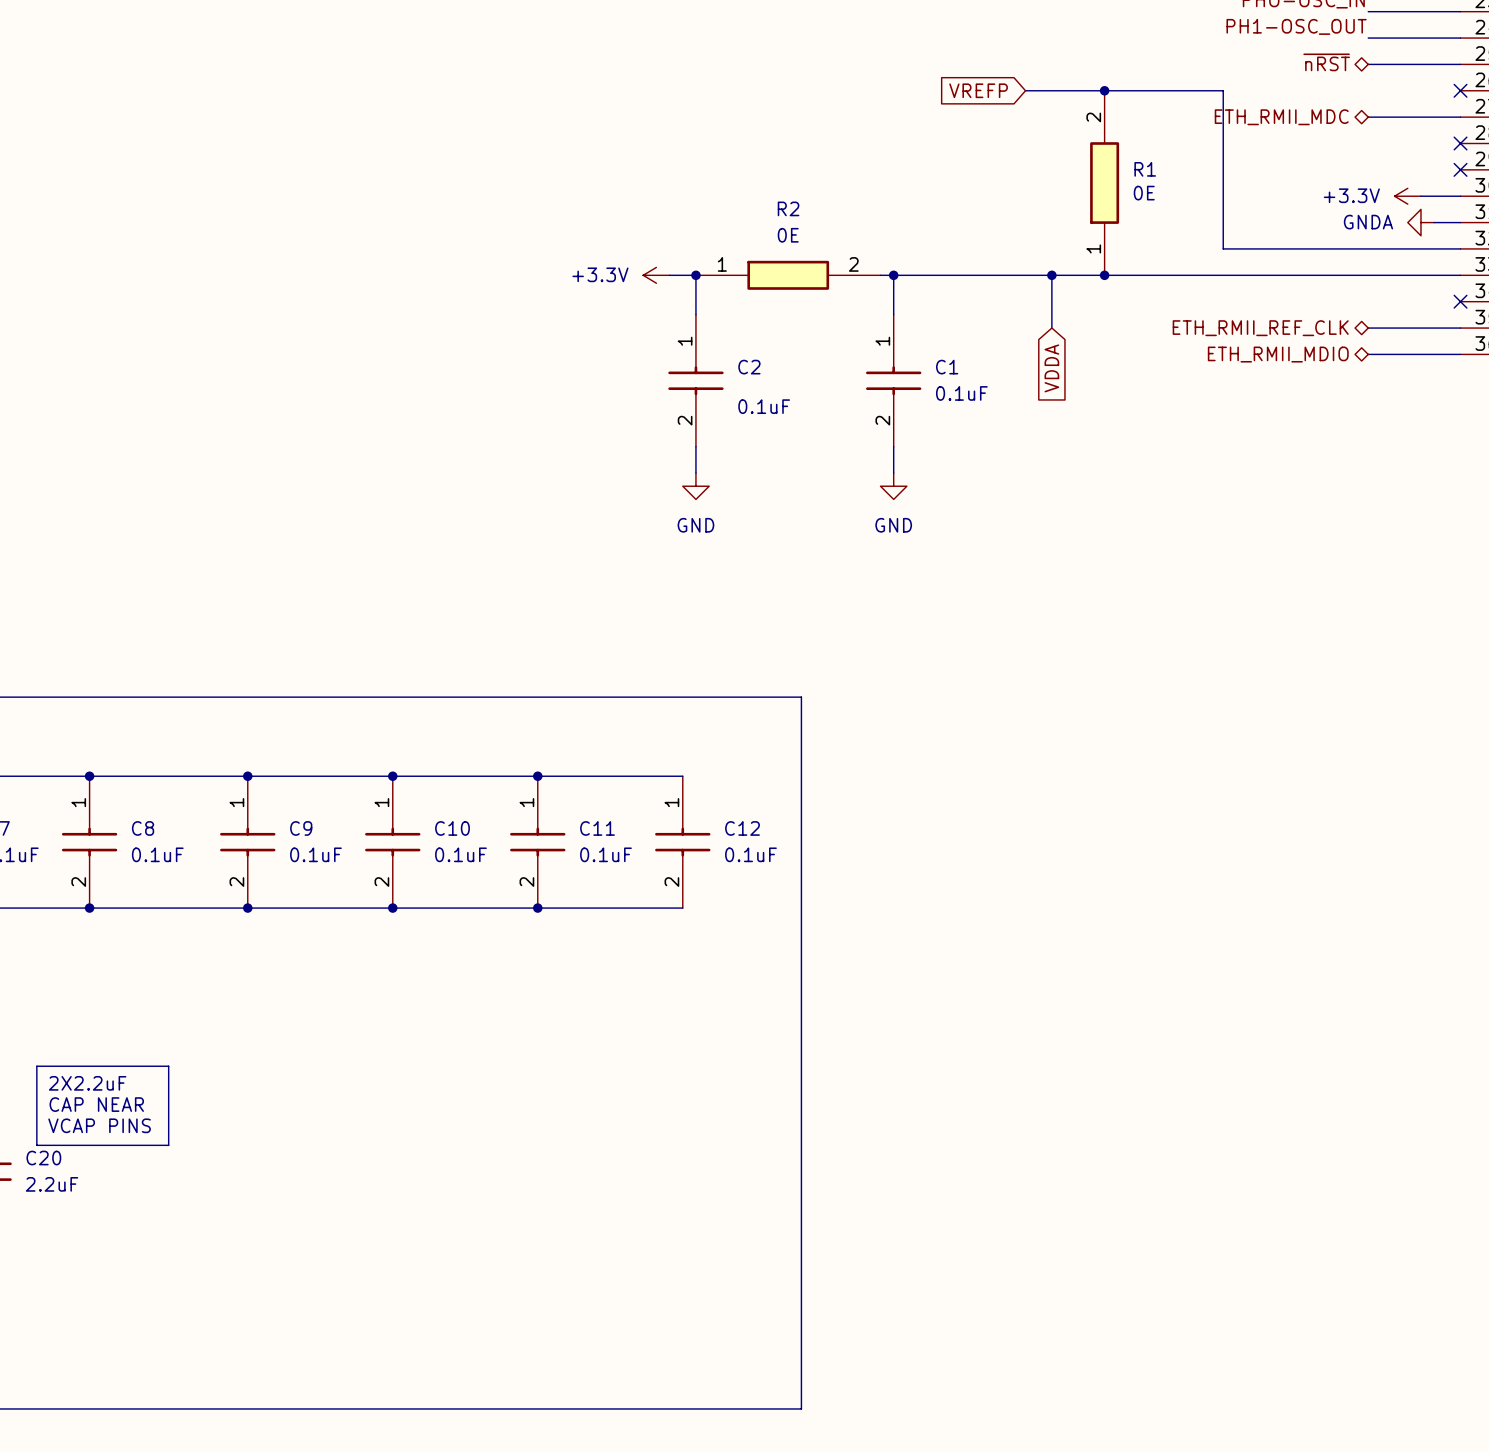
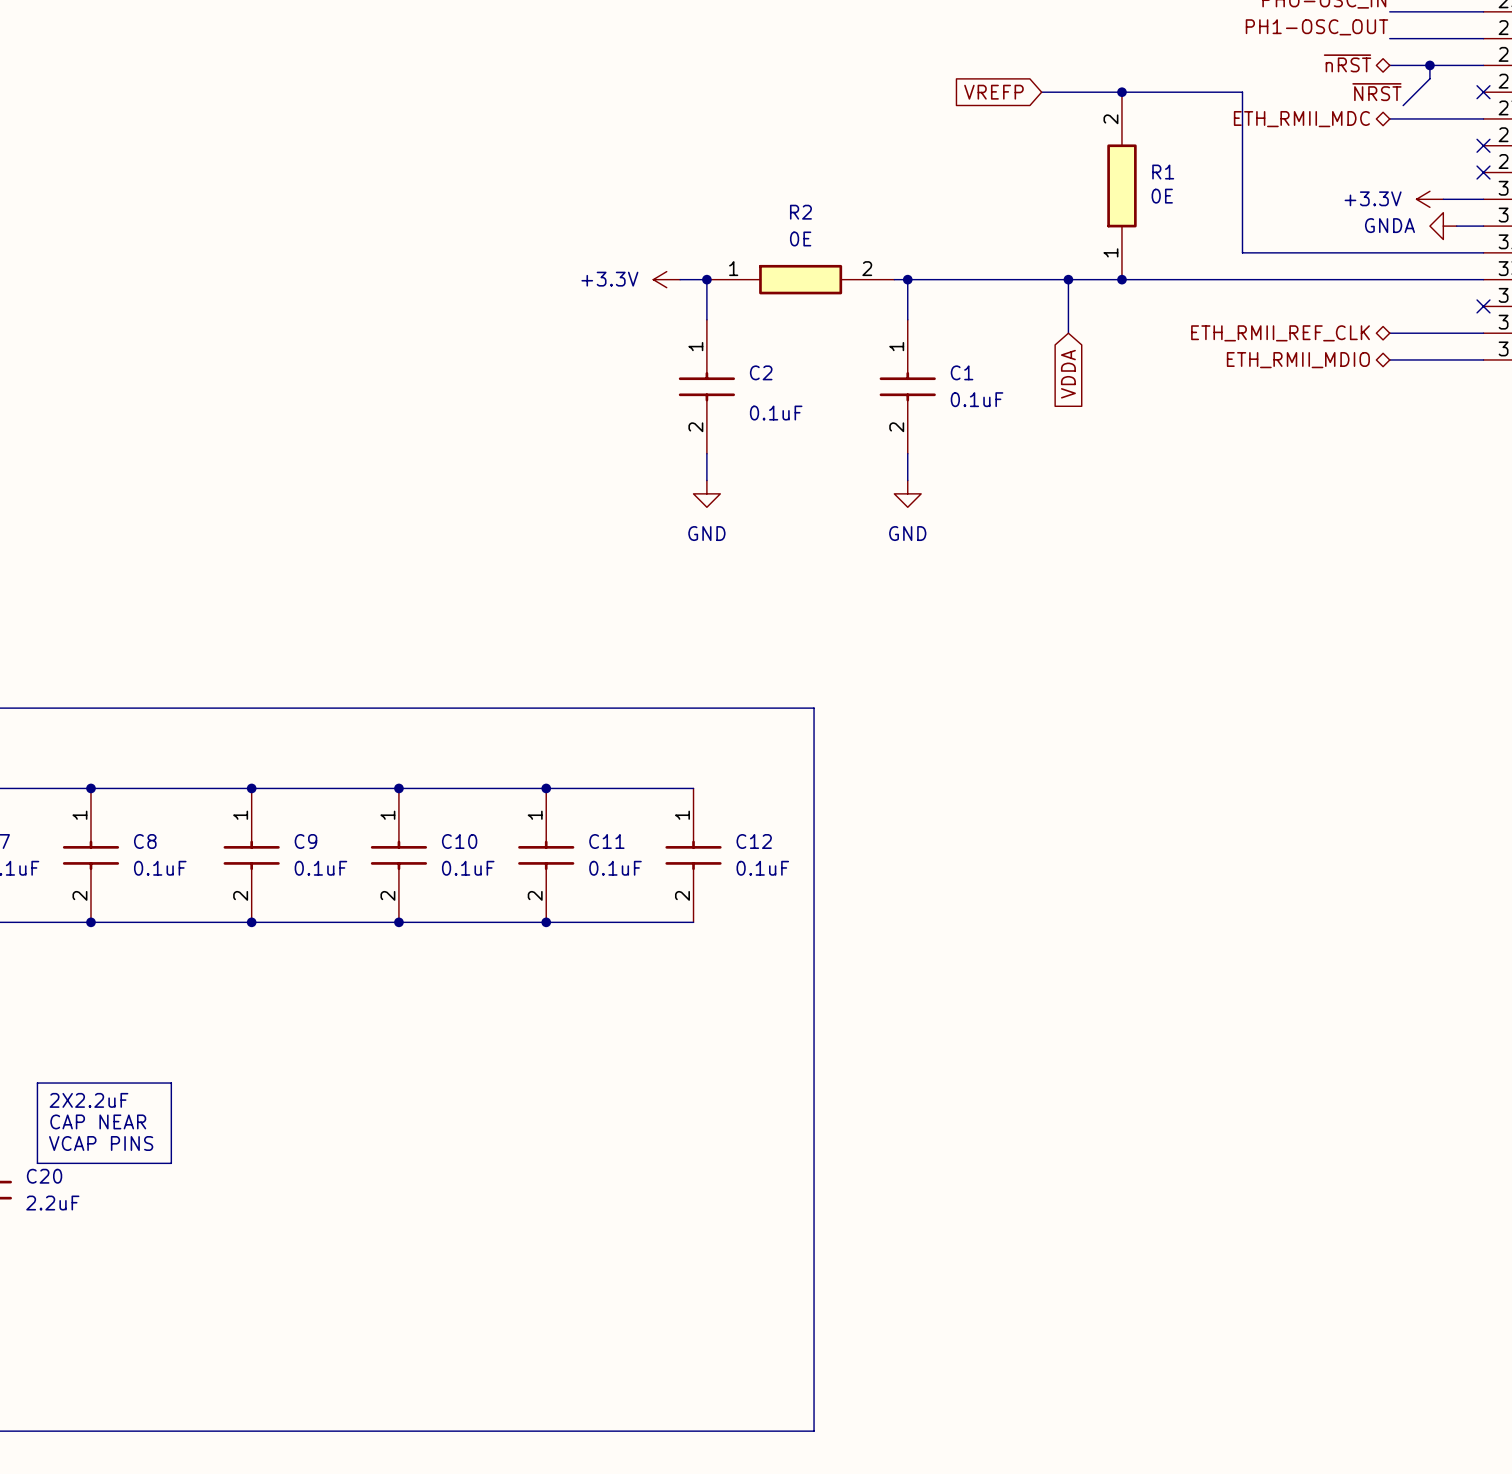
wire: none -> (1429, 65) (1429, 78) (1403, 105)
junction: none -> (1429, 65)
label: none -> ~{NRST} (1376, 92)

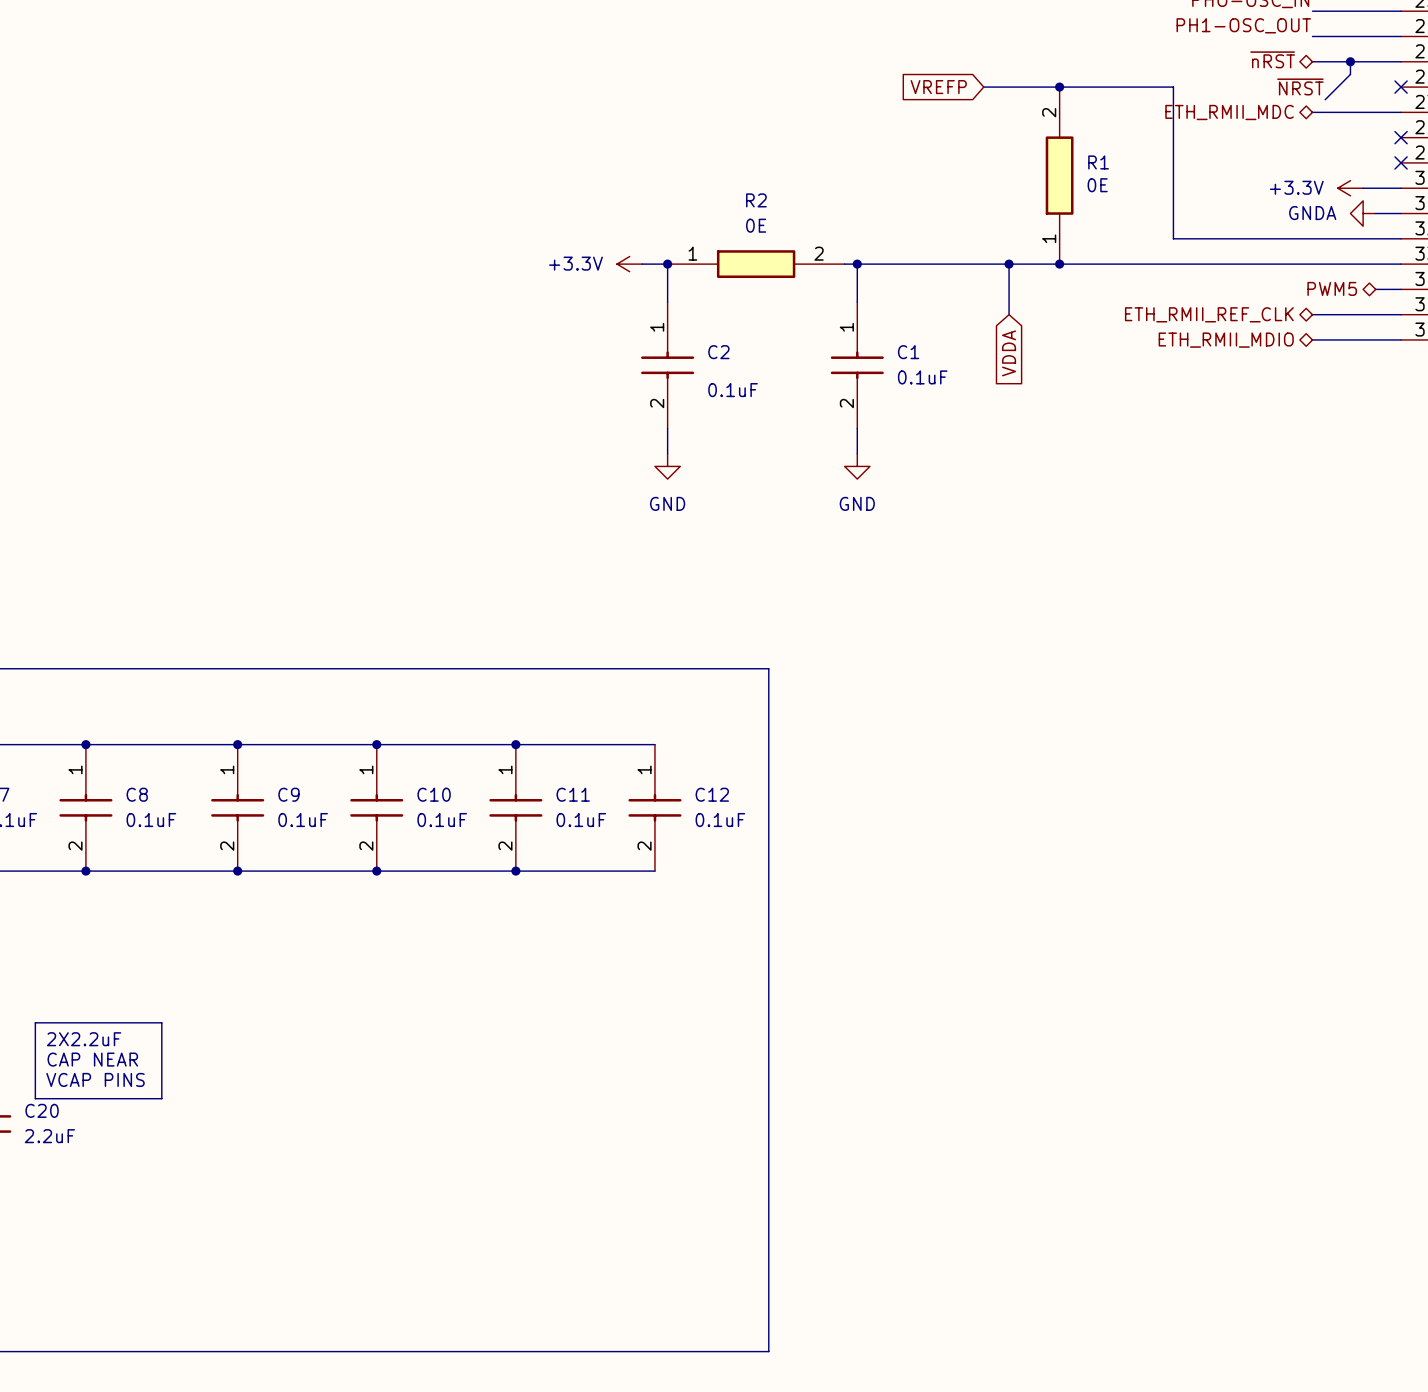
hierarchical label: none -> PWM5 (1332, 288)
wire: none -> (1375, 289) (1401, 289)
no-connect mark: (1483, 306) -> none

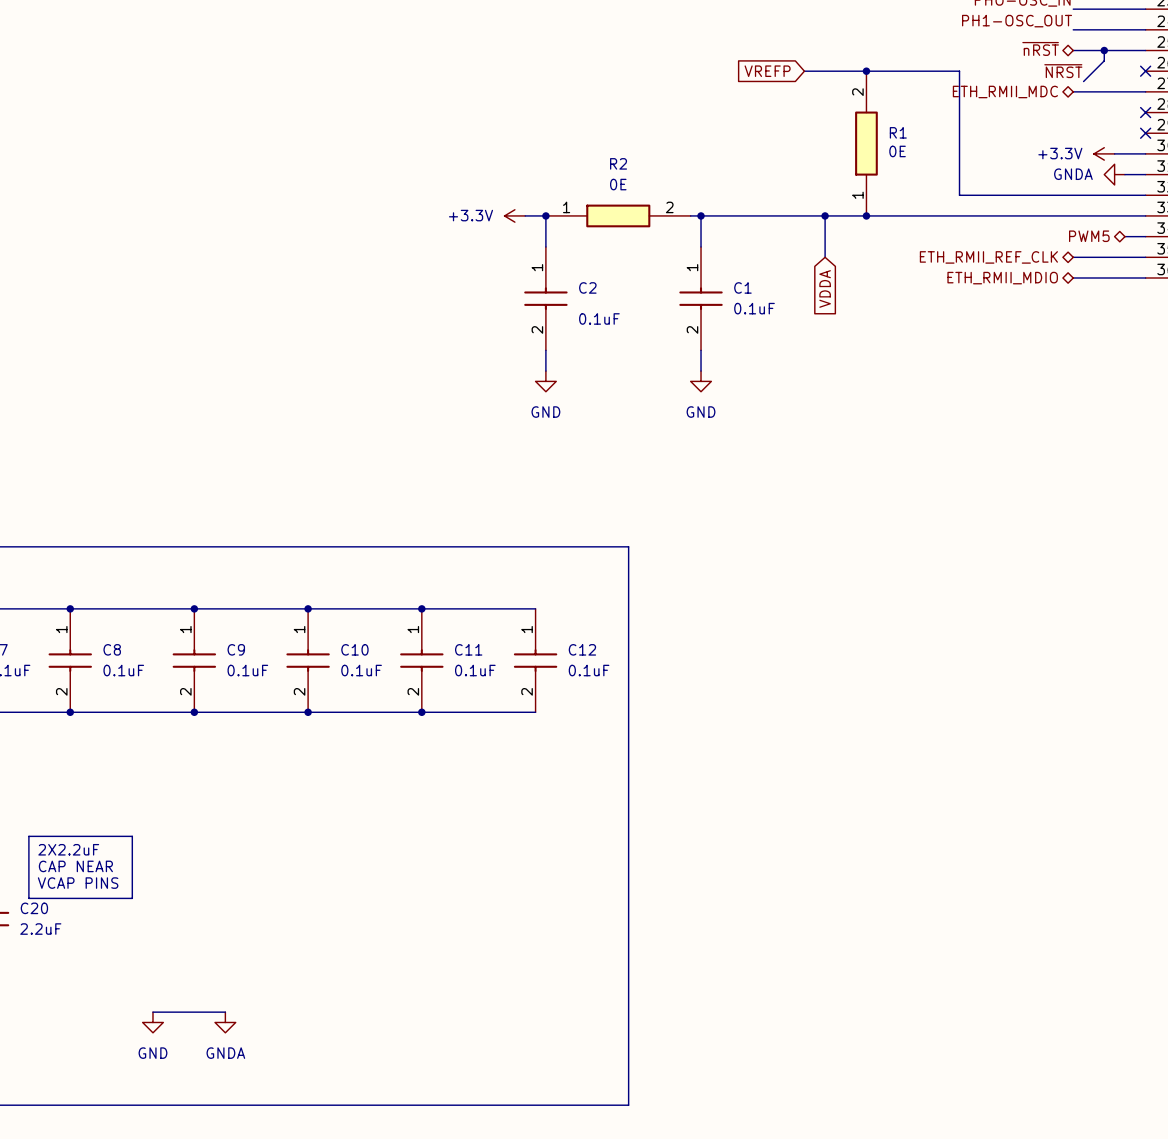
wire: none -> (152, 1012) (225, 1012)
power symbol: none -> GND (152, 1022)
power symbol: none -> GNDA (225, 1022)

